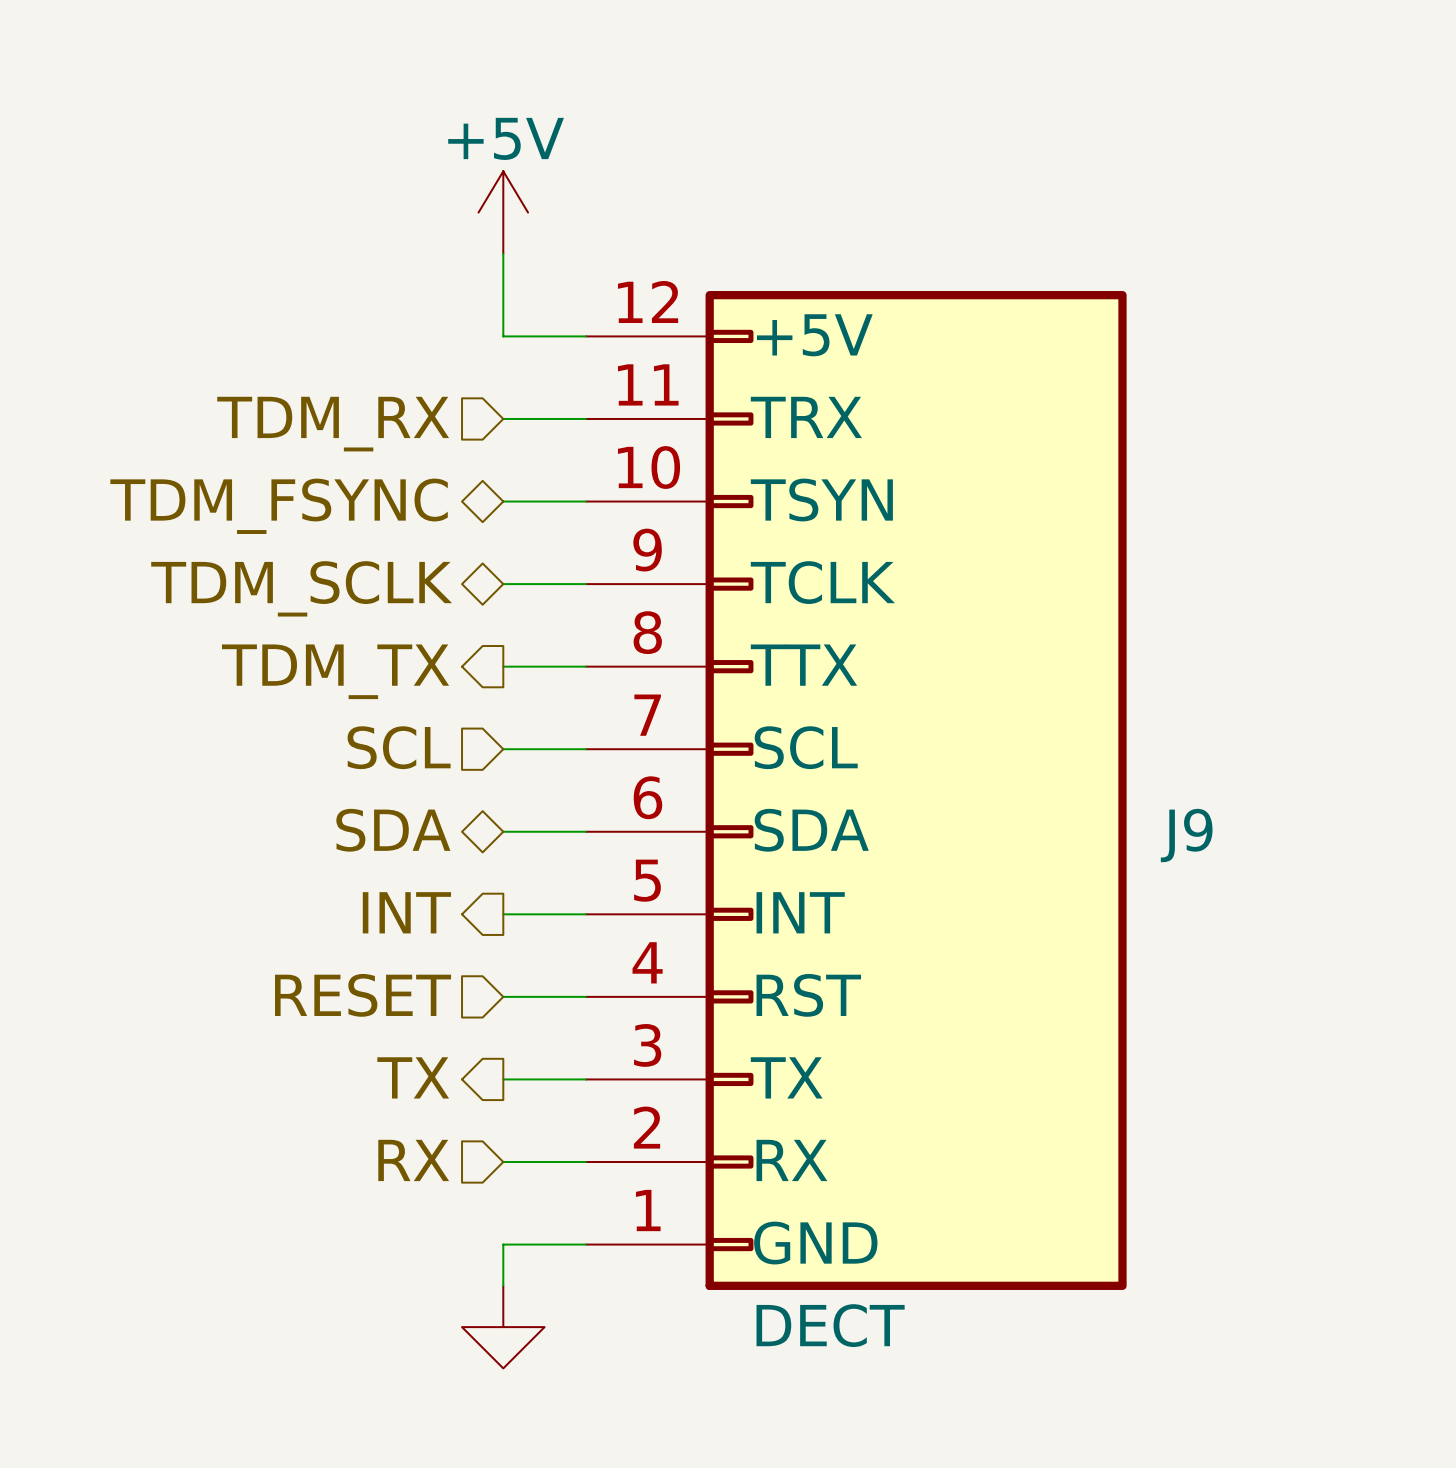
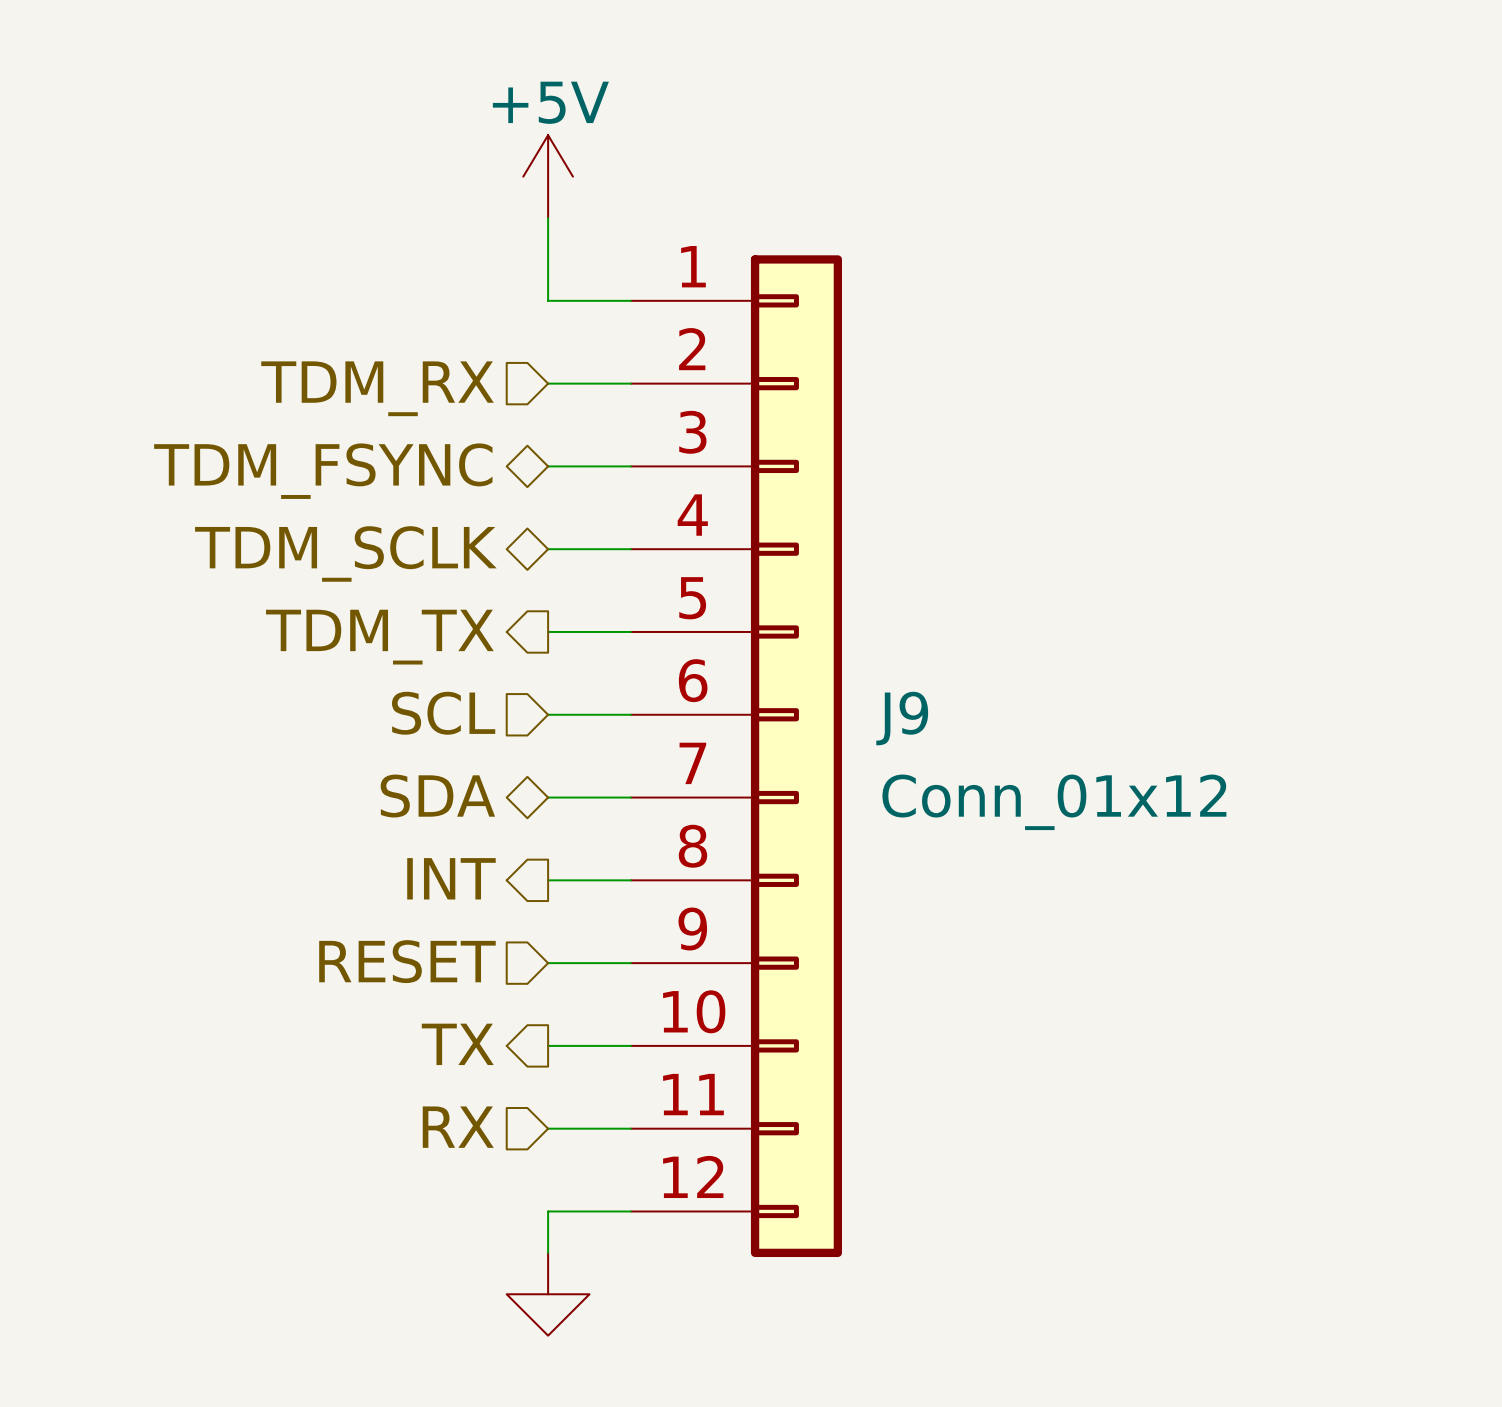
J9 symbol: [585, 291, 1127, 1290] -> [630, 255, 843, 1258]
J9 text: +5V (814, 335) -> none
J9 text: TRX (806, 417) -> none
J9 text: TSYN (821, 500) -> none
J9 text: TCLK (822, 582) -> none
J9 text: TTX (803, 665) -> none
J9 text: SCL (806, 747) -> none
J9 text: SDA (811, 830) -> none
J9 name position: J9 (1186, 835) -> J9 (902, 718)
J9 value: none -> Conn_01x12 (1054, 802)
J9 text: INT (800, 912) -> none
J9 text: RST (808, 995) -> none
J9 text: TX (786, 1077) -> none
J9 text: RX (791, 1160) -> none
J9 text: GND (815, 1243) -> none
J9 text: DECT (830, 1325) -> none

